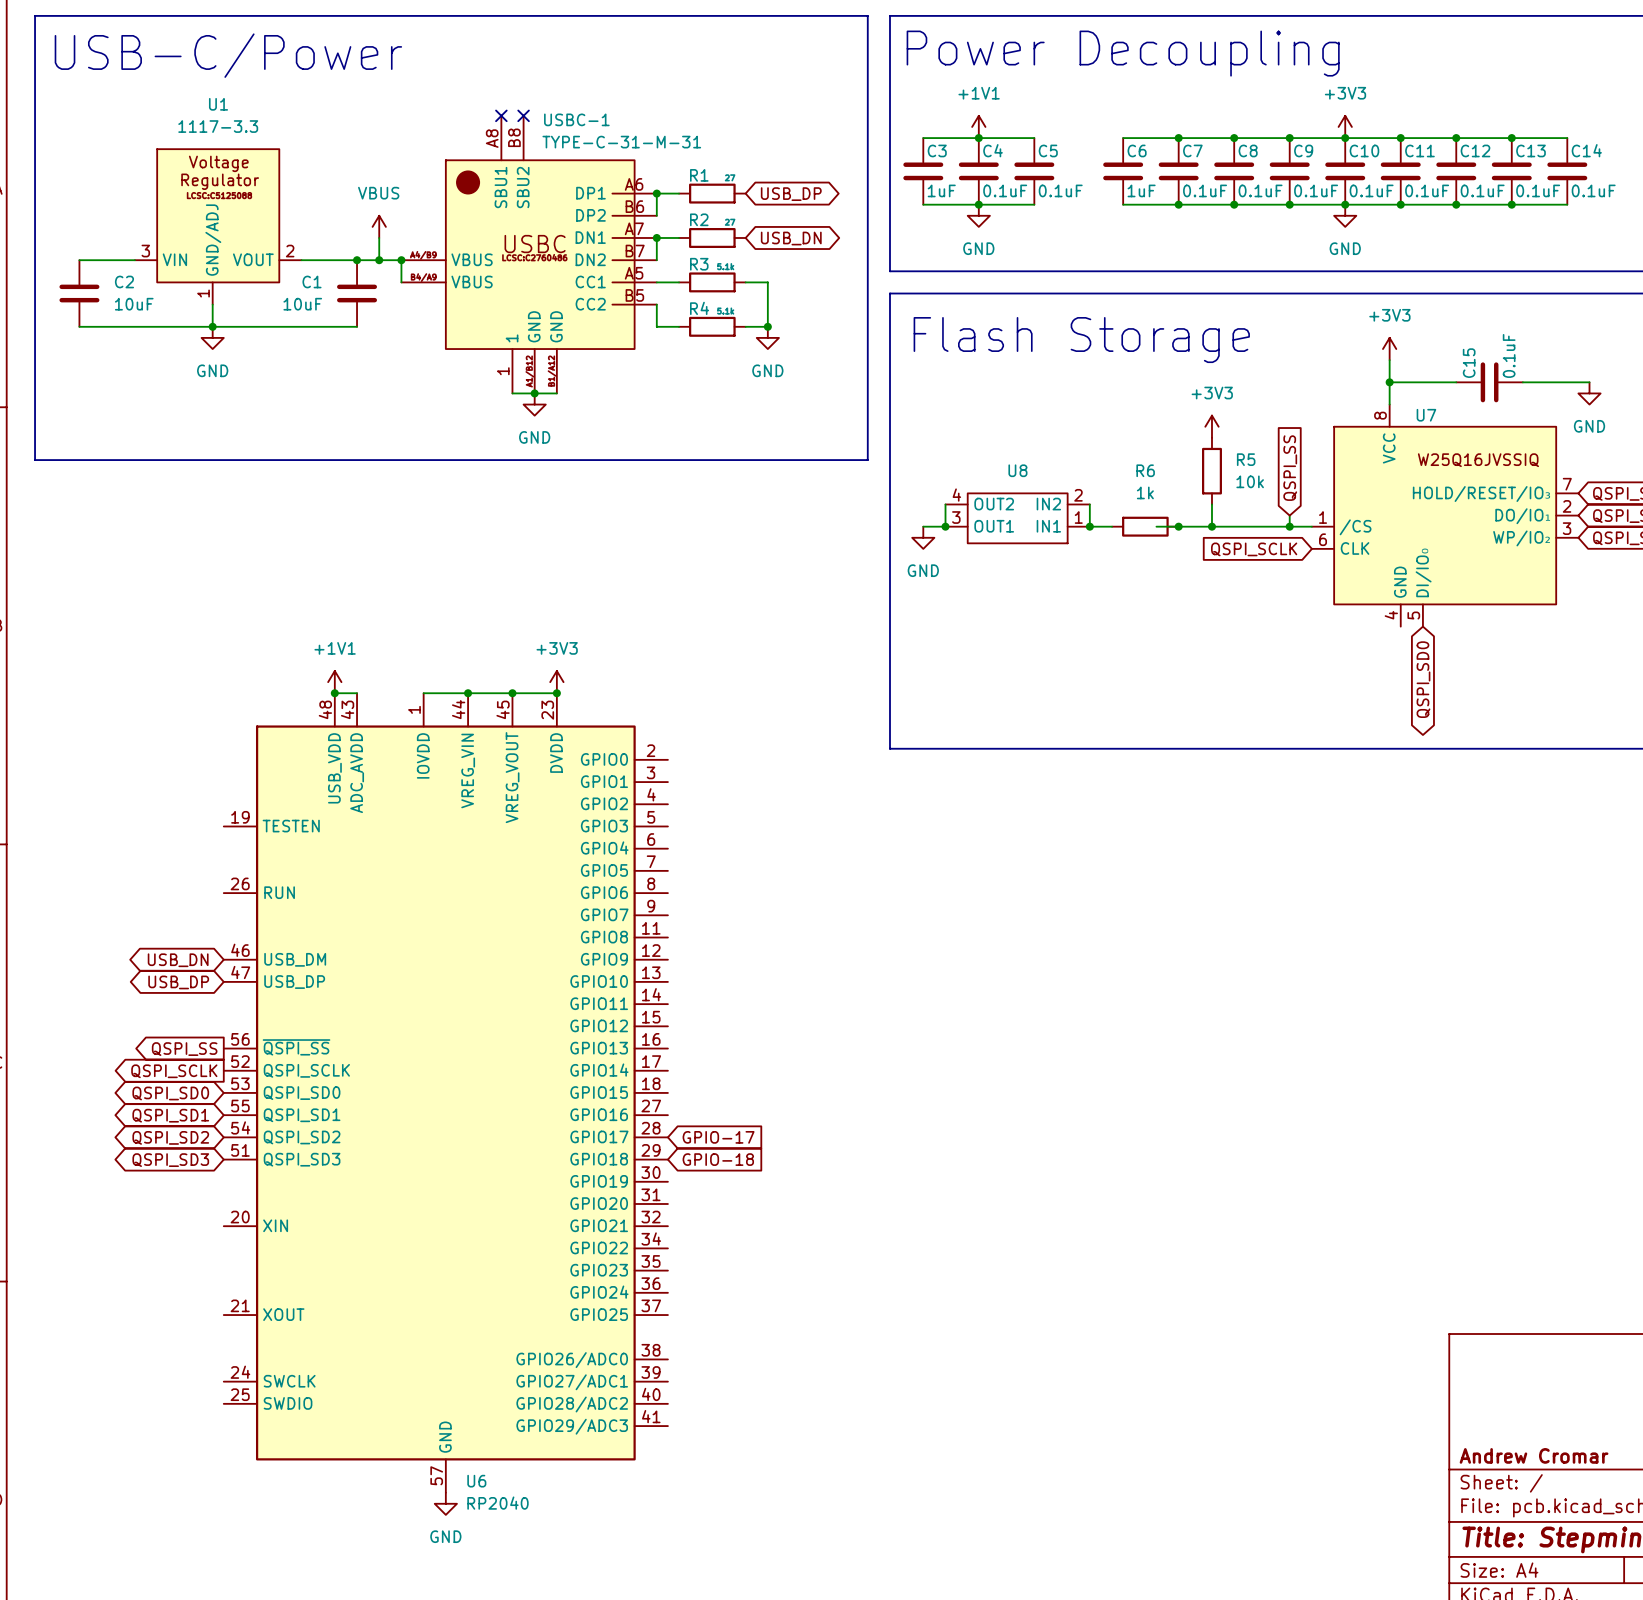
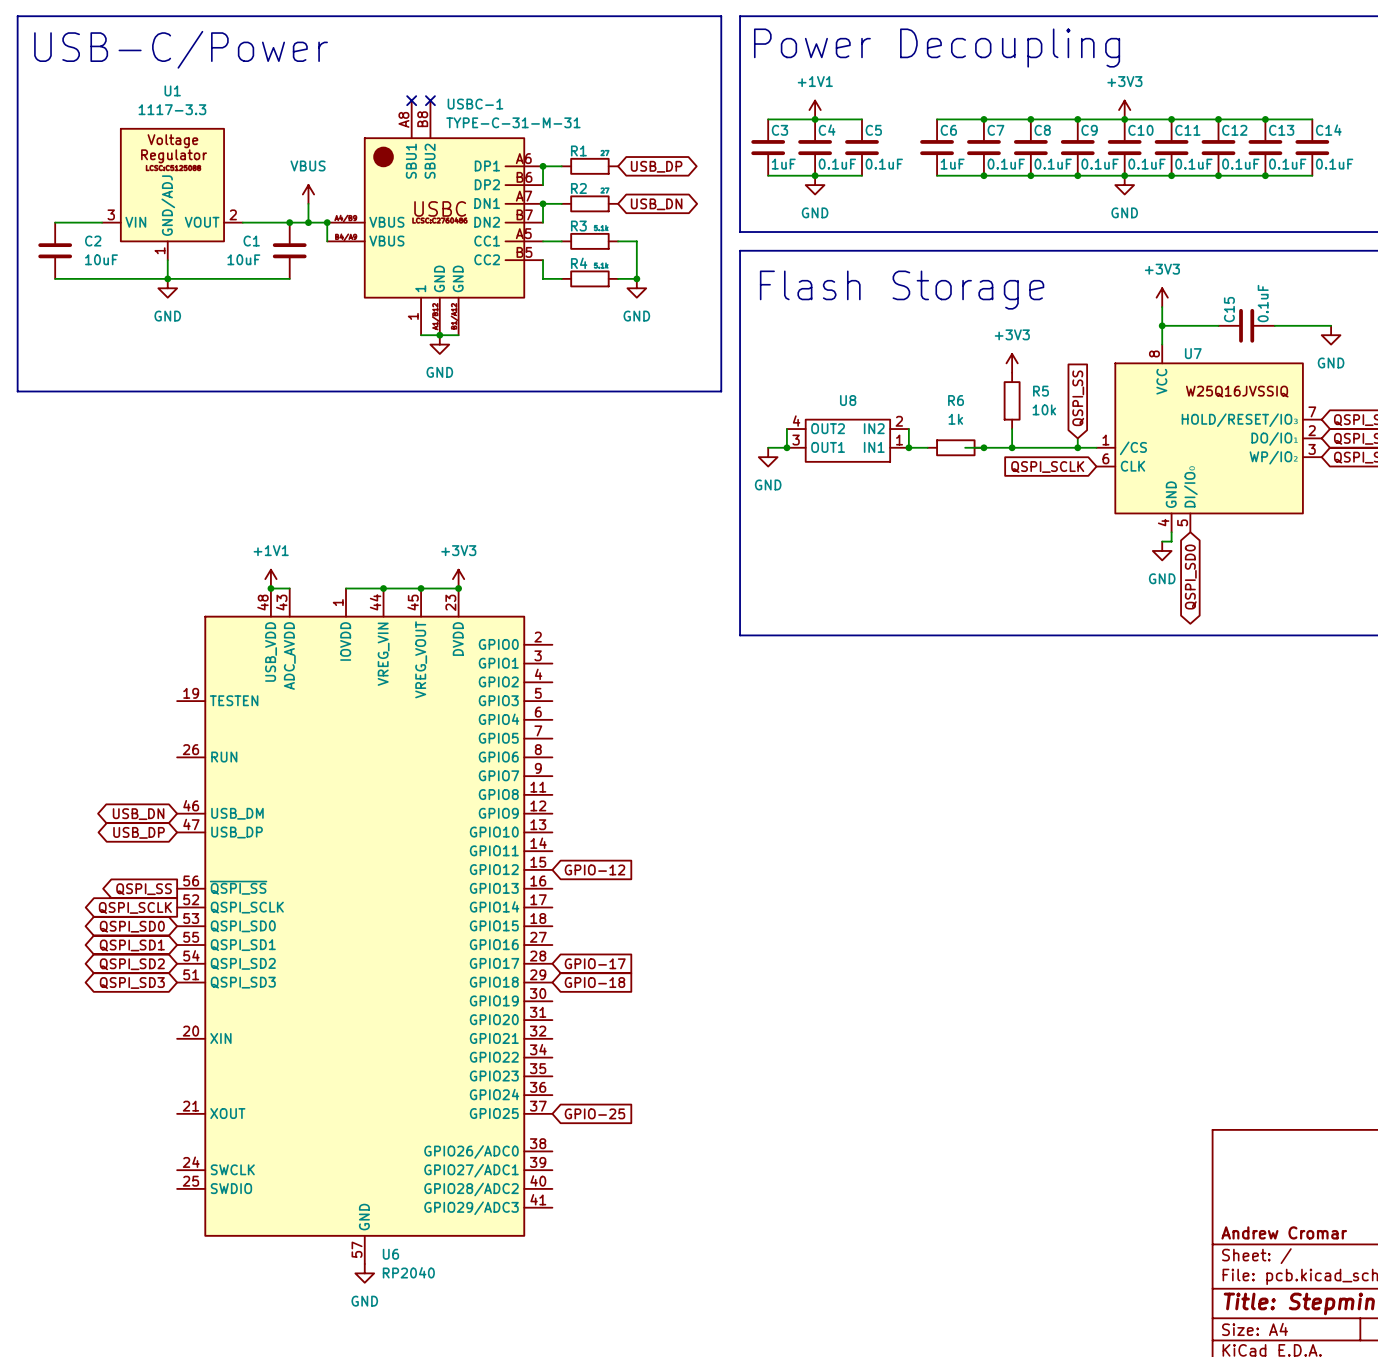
wire: none -> (1171, 532) (1171, 541) (1162, 541)
power symbol: none -> GND (1162, 550)
global label: none -> GPIO-12 (594, 869)
global label: none -> GPIO-25 (594, 1113)

